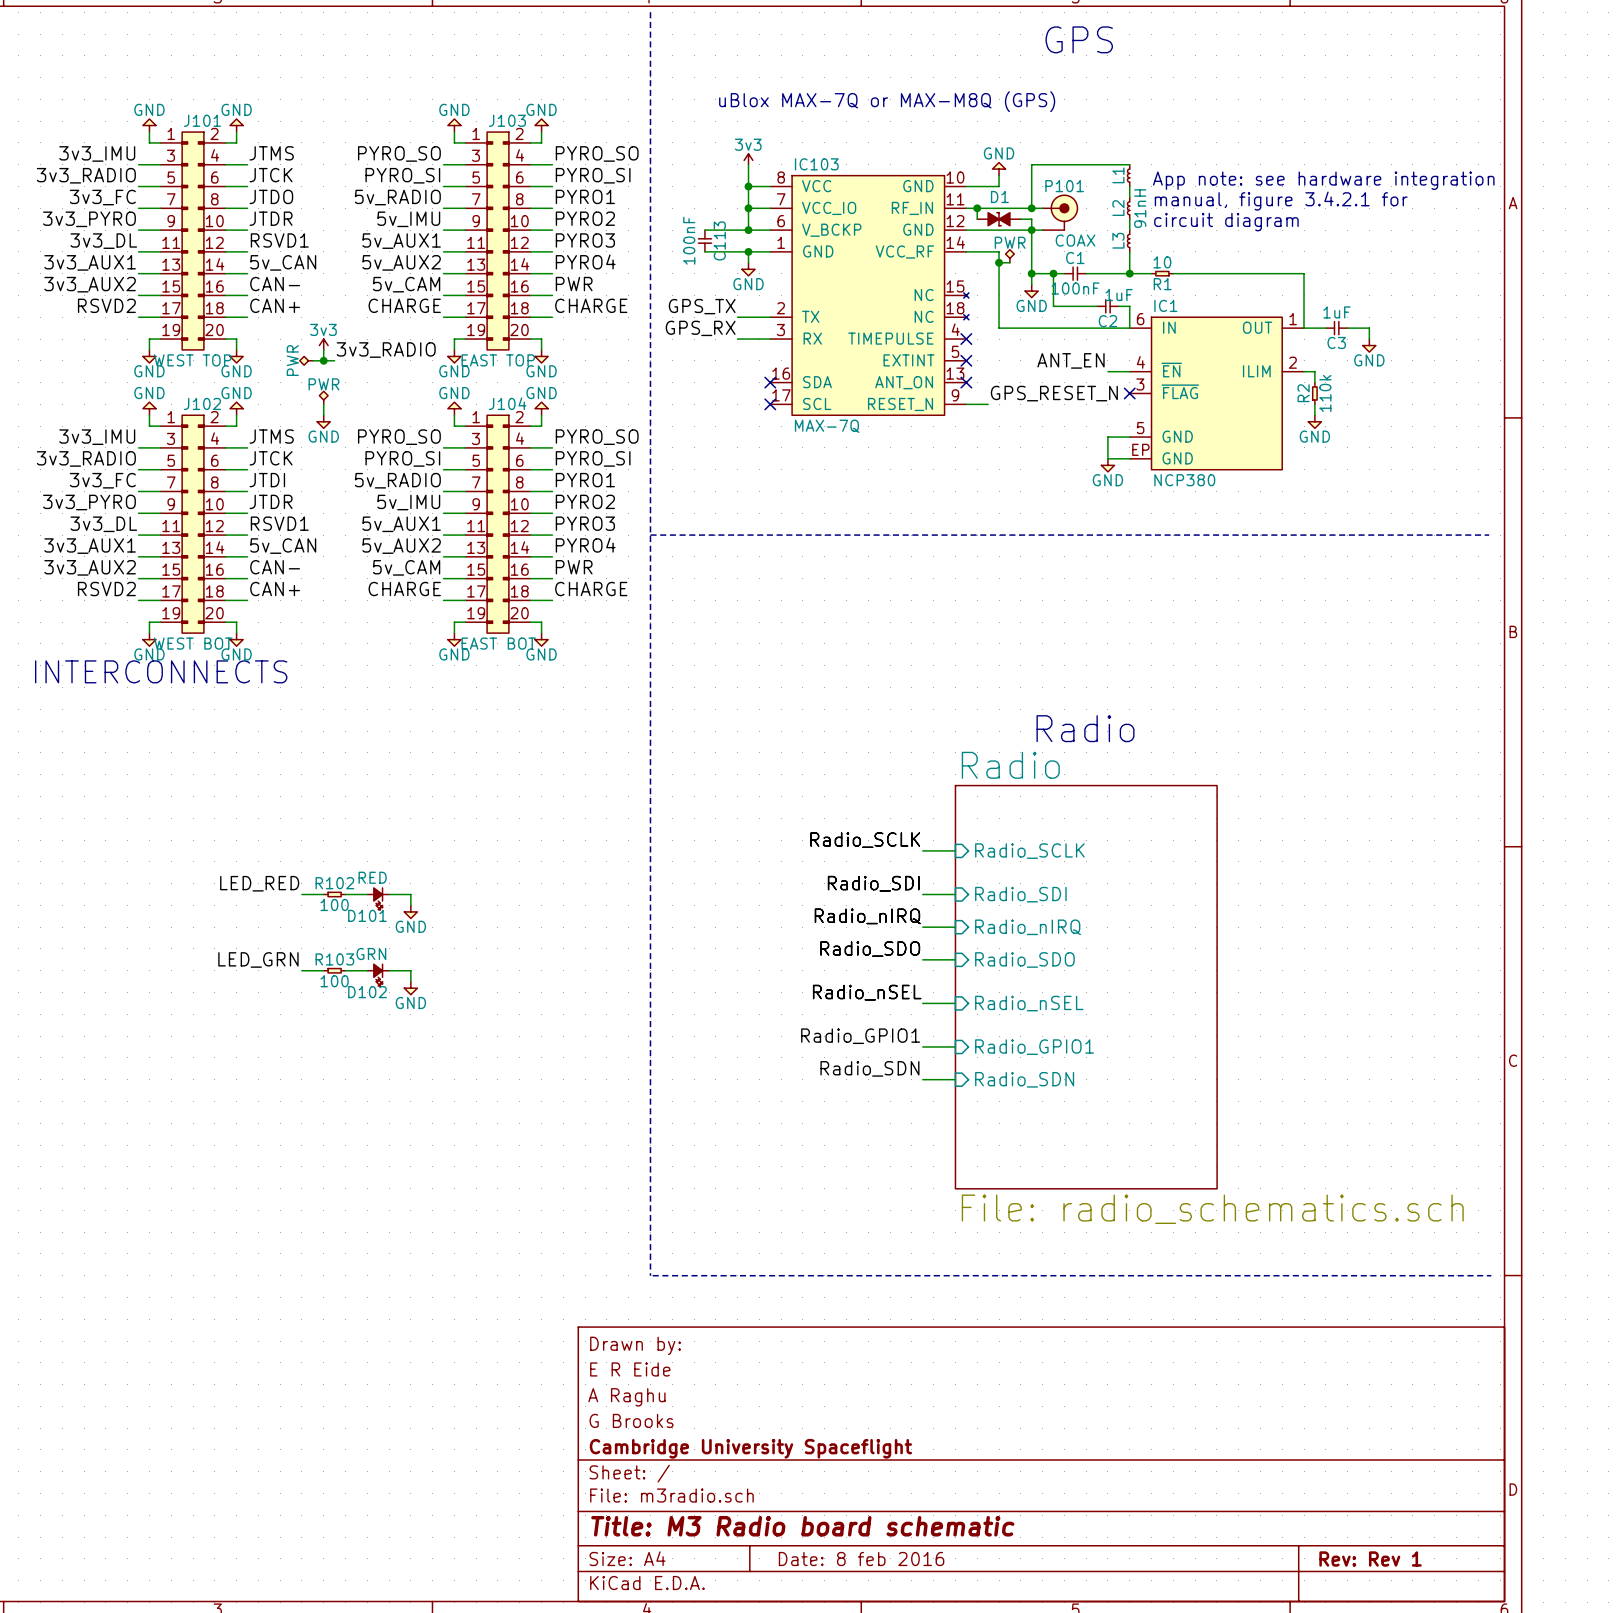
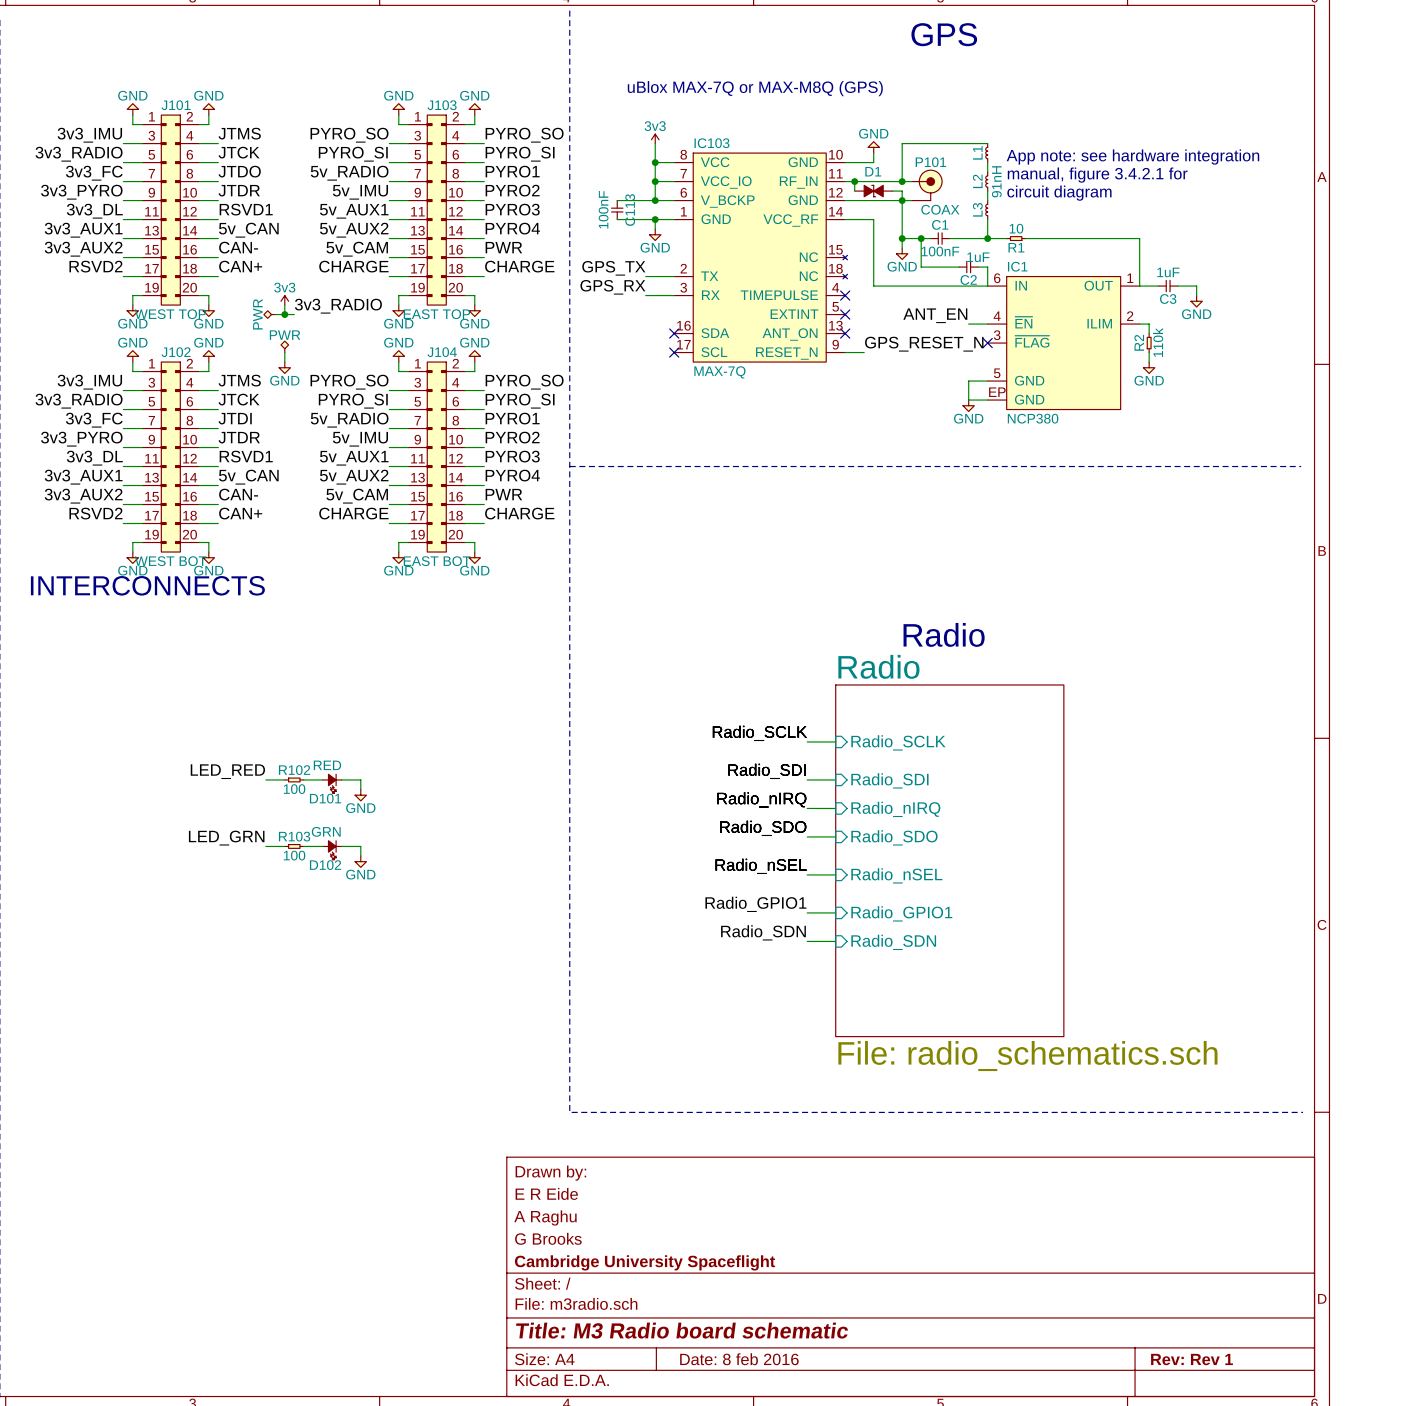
power symbol: PWR (1009, 256) -> none
wire: (999, 262) (1009, 262) -> none
junction: (999, 262) -> none

